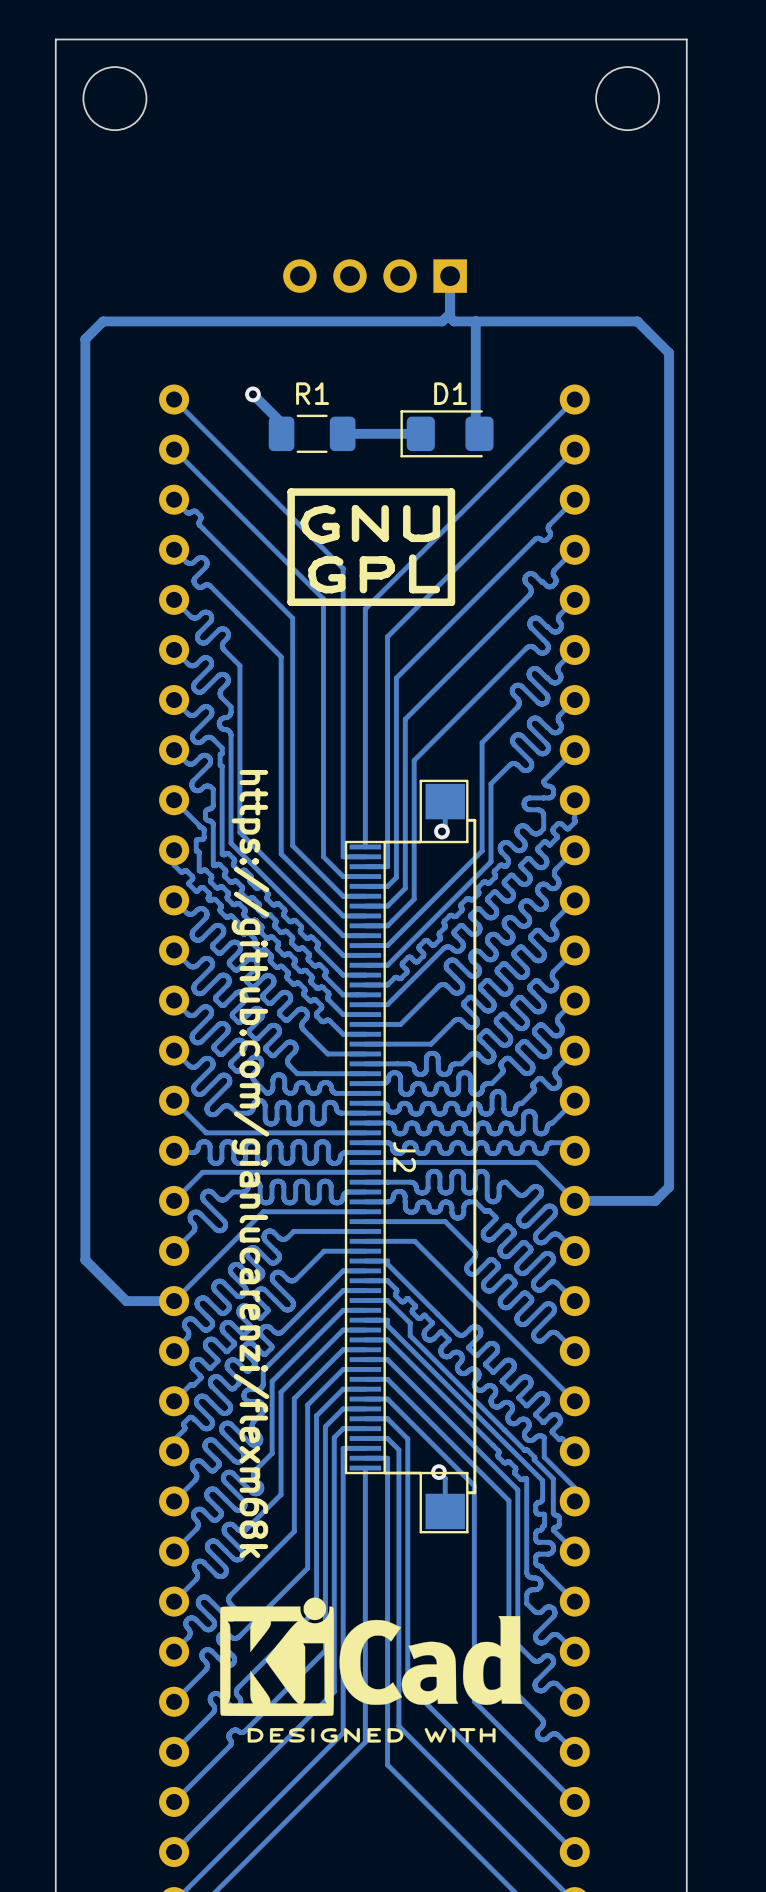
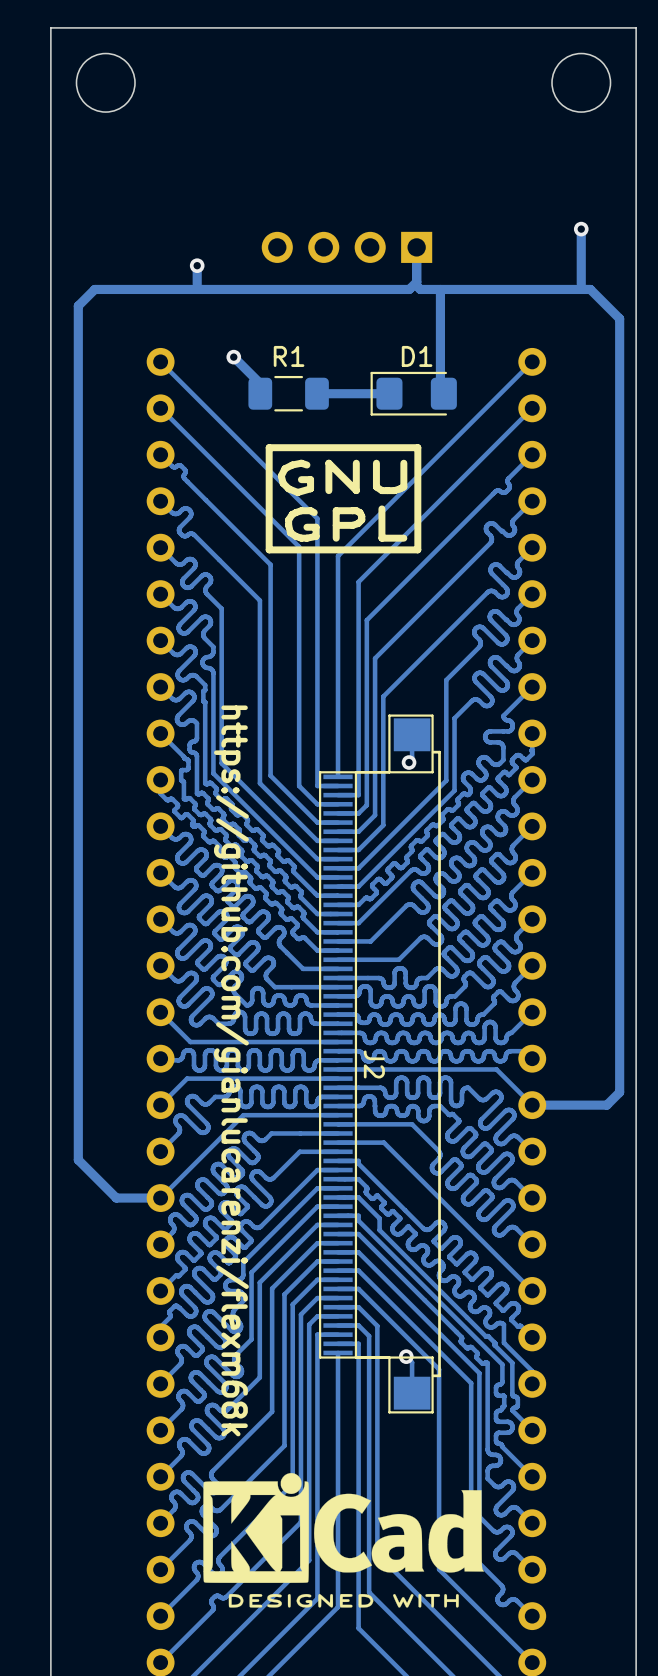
track: none -> (581, 229) (581, 283) (586, 289)
via: none -> (581, 229)
track: none -> (197, 265) (197, 283) (202, 289)
via: none -> (197, 265)

